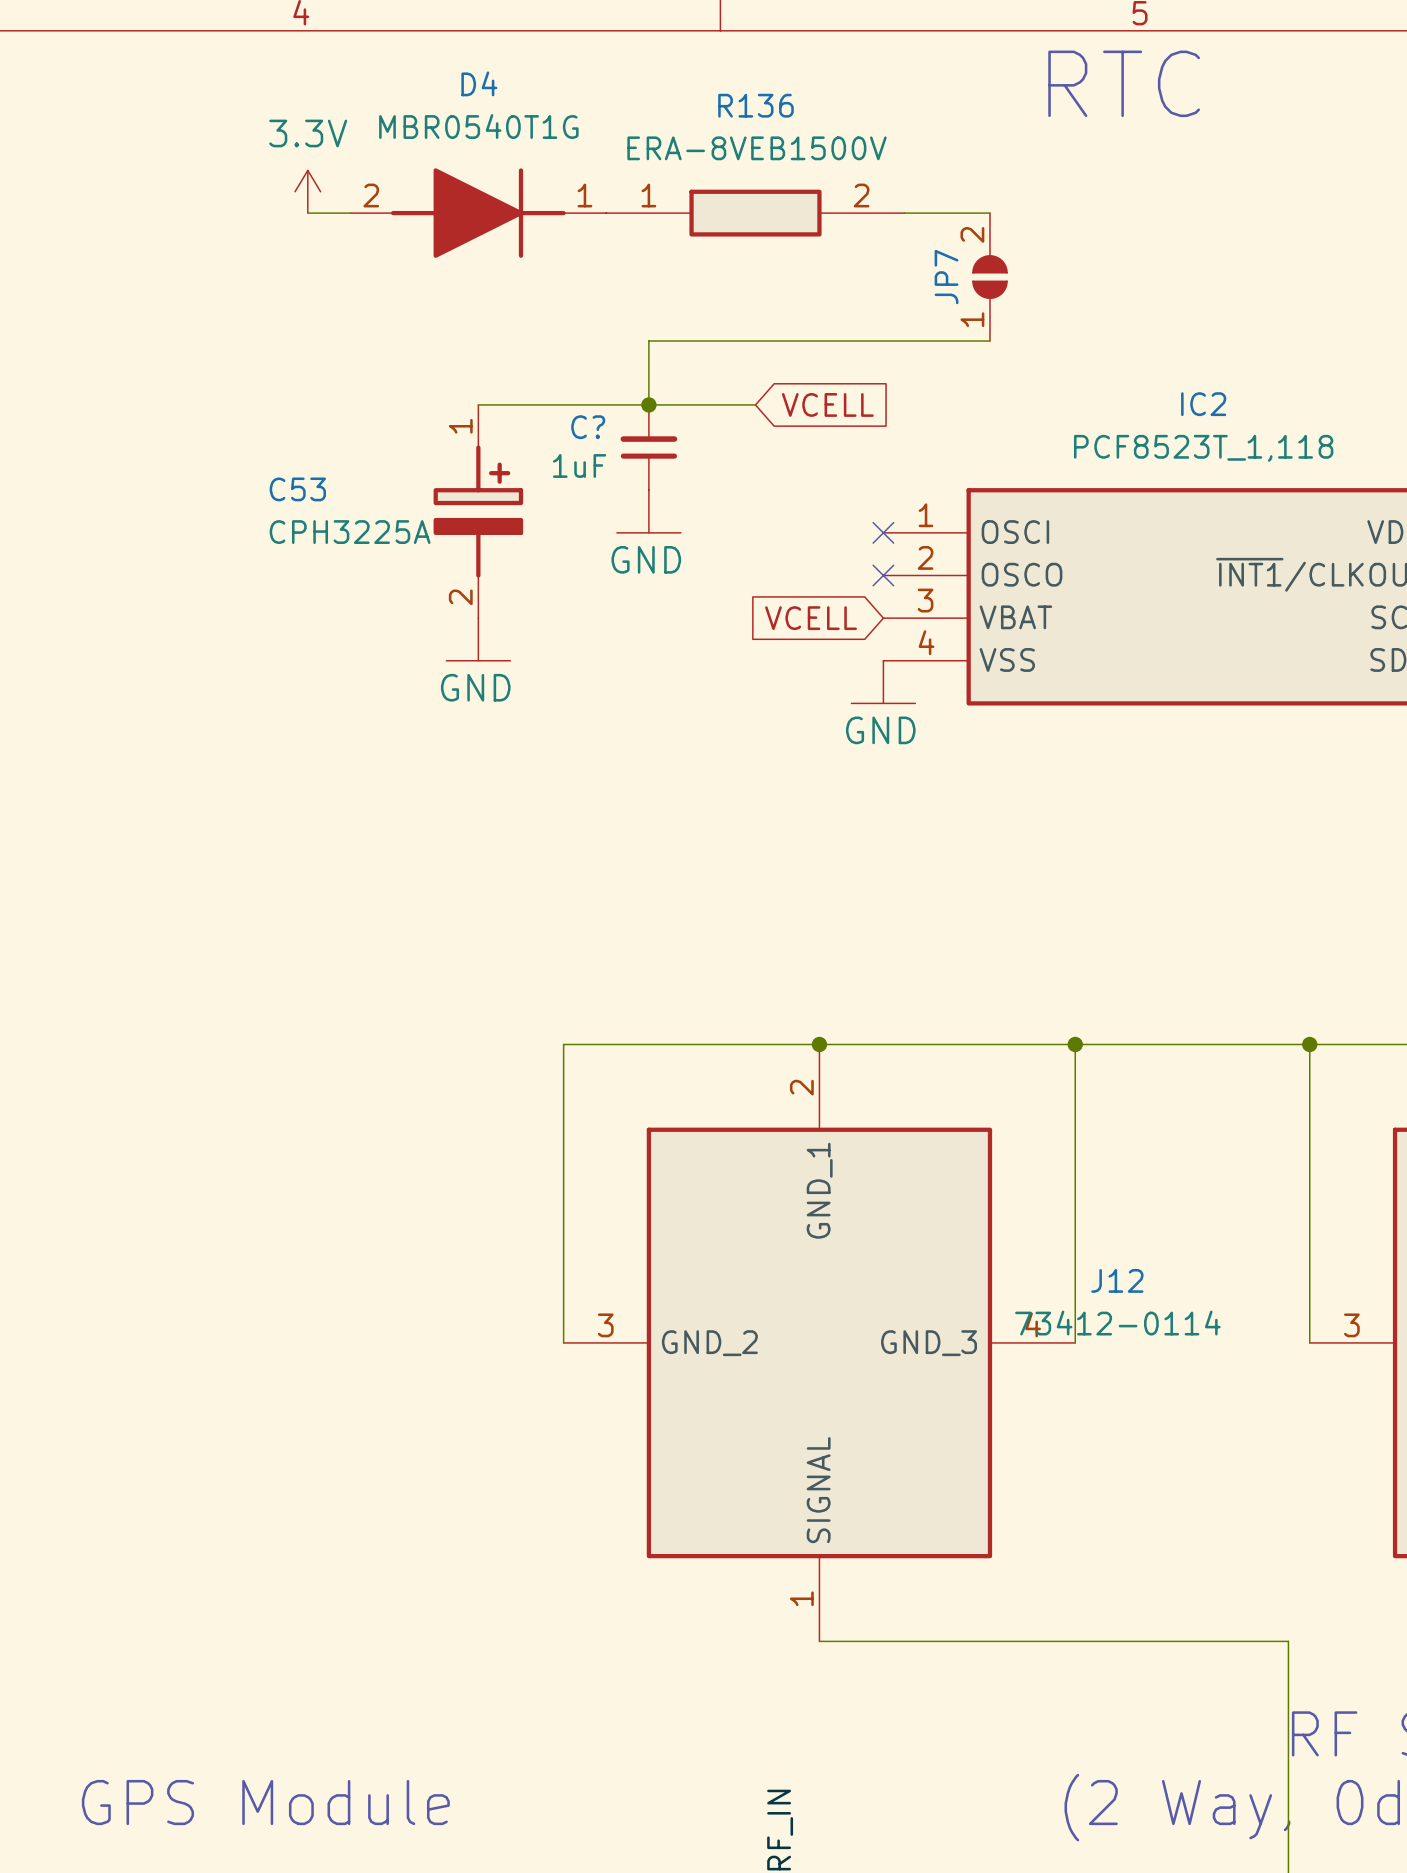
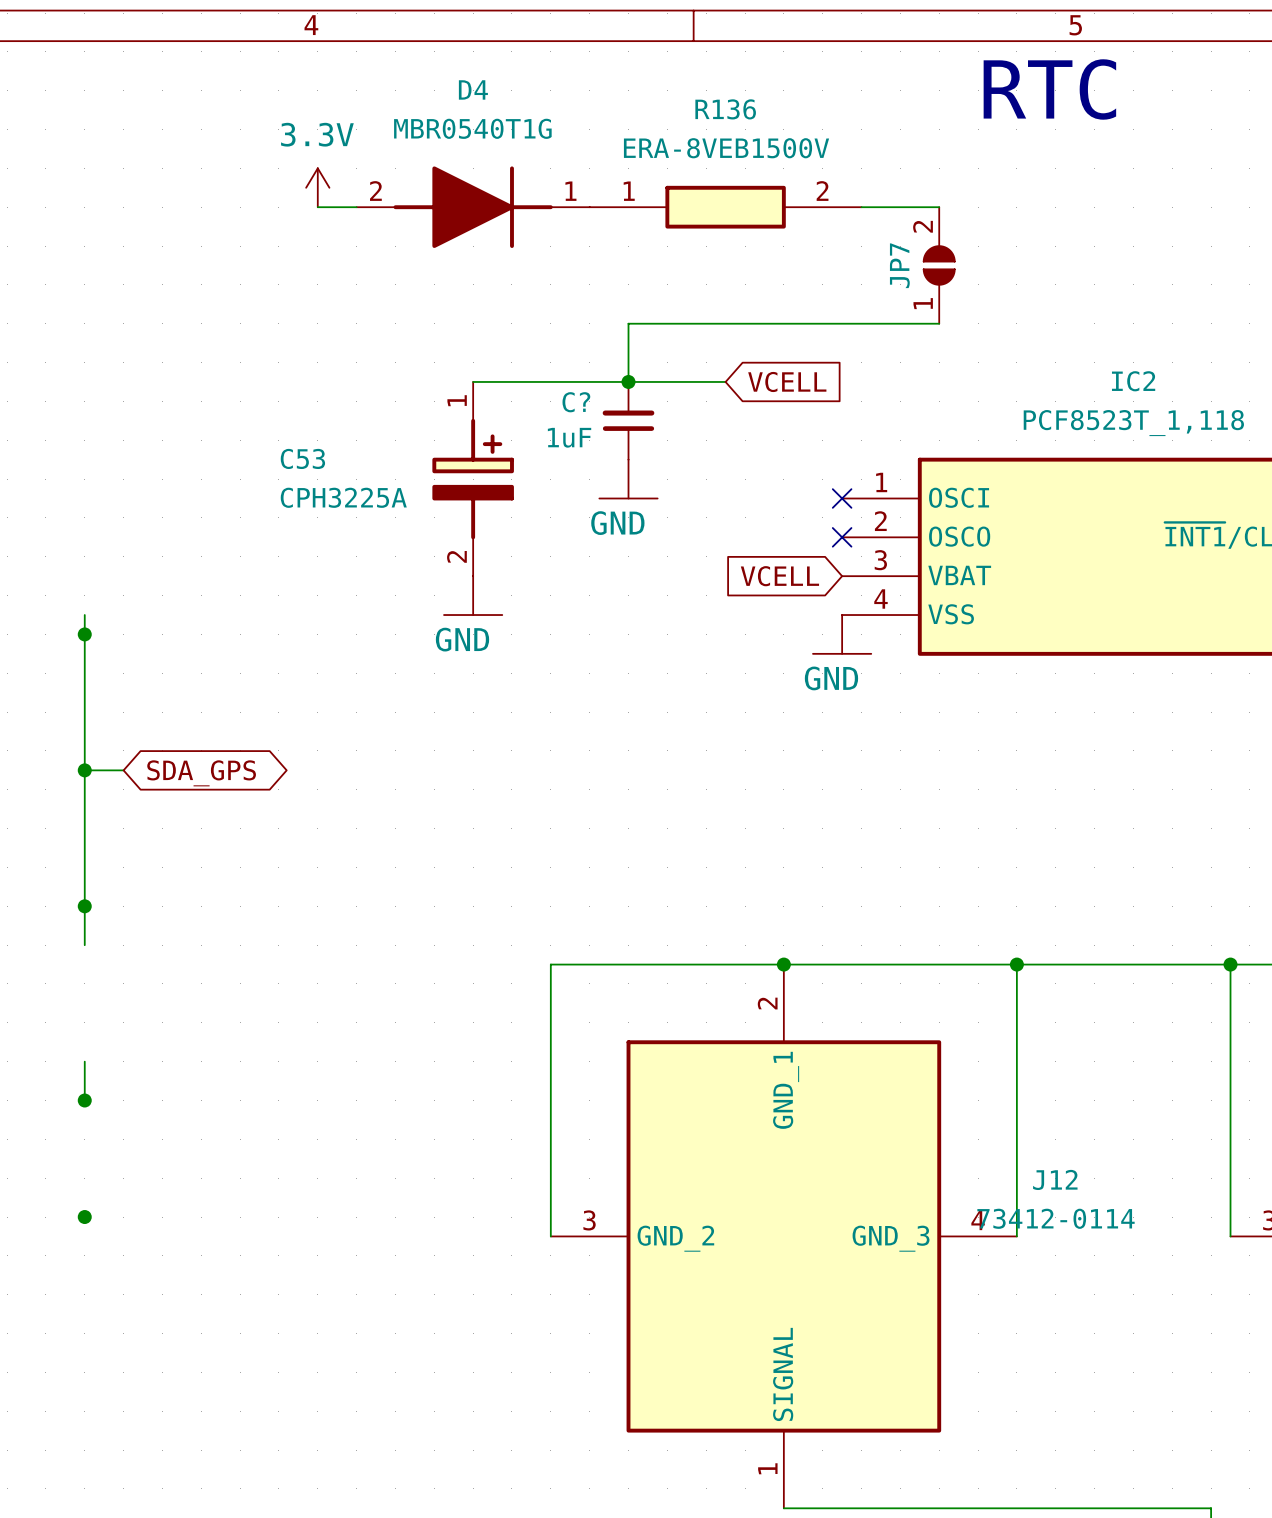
wire: none -> (84, 615) (84, 945)
junction: none -> (84, 634)
wire: none -> (84, 770) (123, 770)
junction: none -> (84, 770)
global label: none -> SDA_GPS (201, 773)
junction: none -> (84, 906)
wire: none -> (84, 1061) (84, 1100)
junction: none -> (84, 1100)
junction: none -> (84, 1217)

